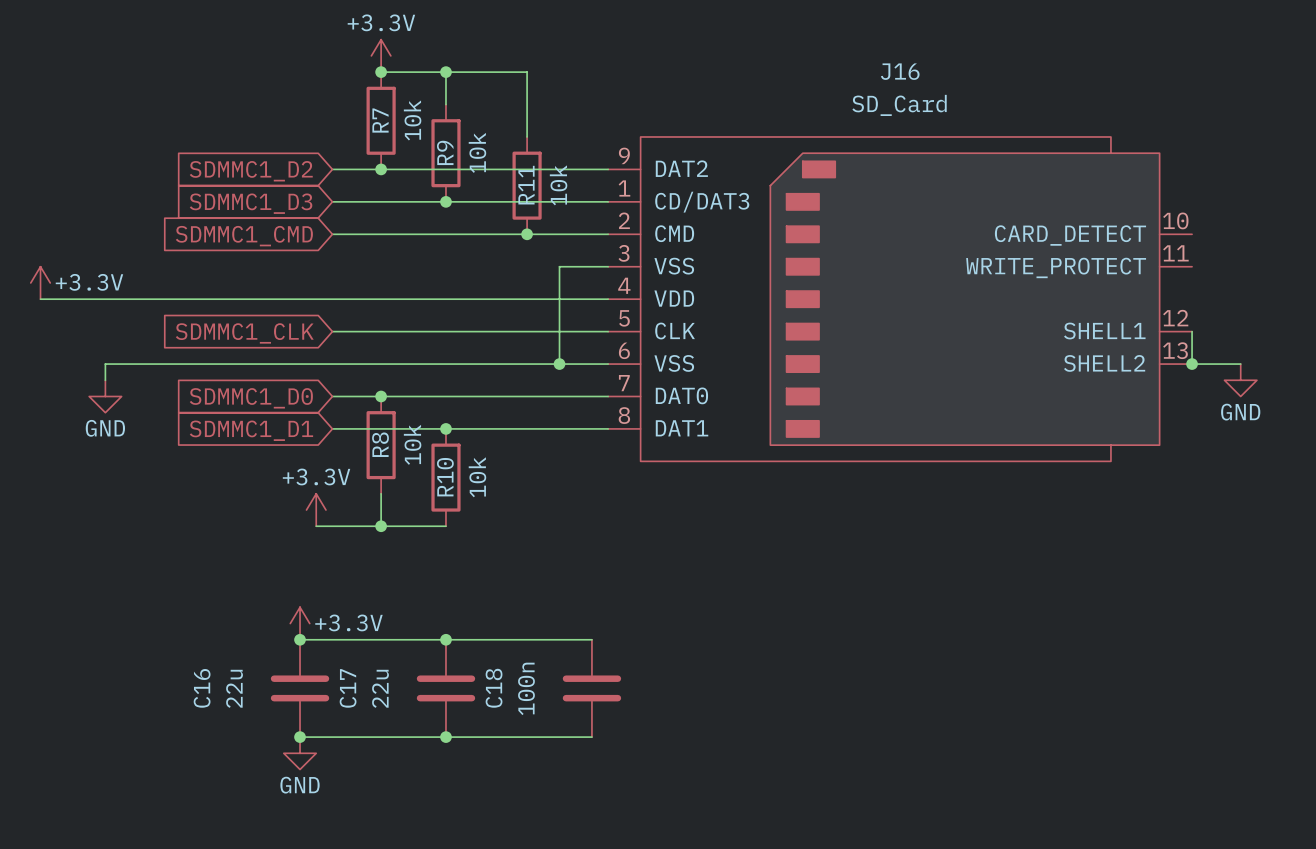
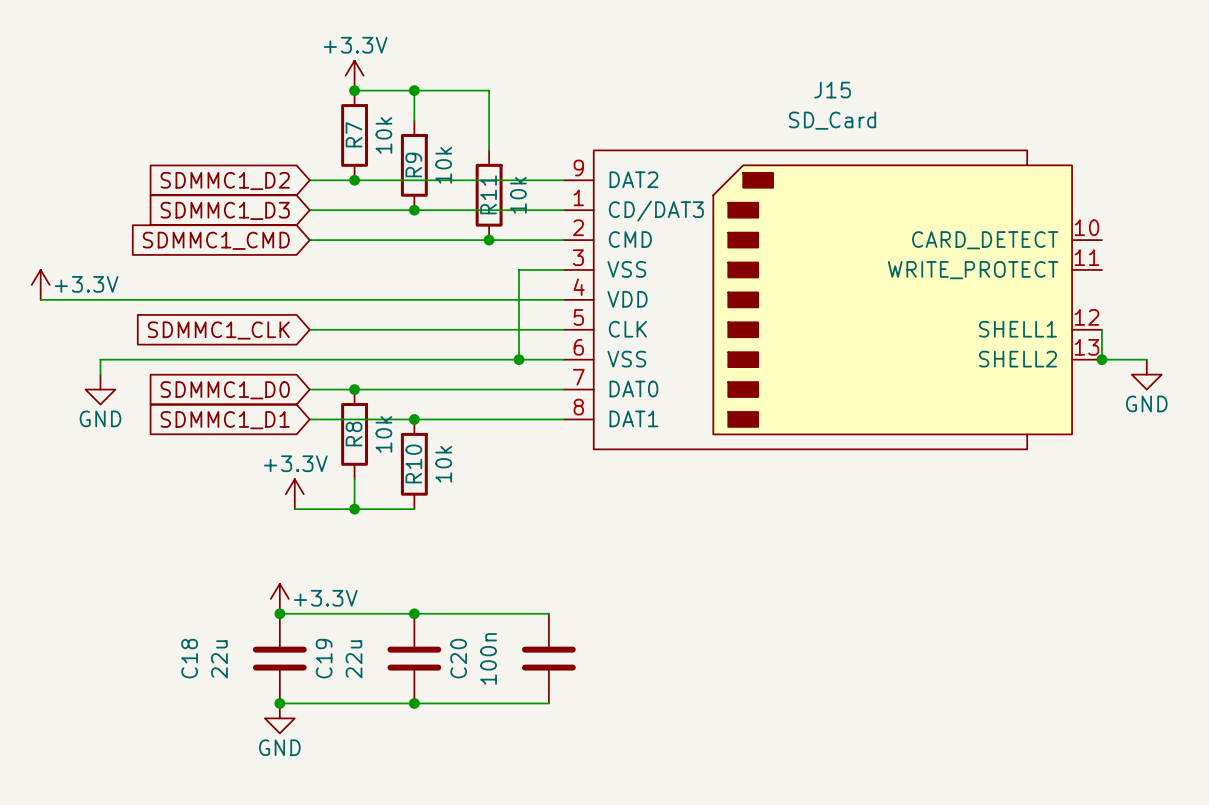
J16 name: J16 (900, 71) -> J15 (832, 90)
C16 name: C16 (202, 688) -> C18 (189, 658)
C17 name: C17 (348, 688) -> C19 (324, 658)
C18 name: C18 (494, 688) -> C20 (458, 658)

